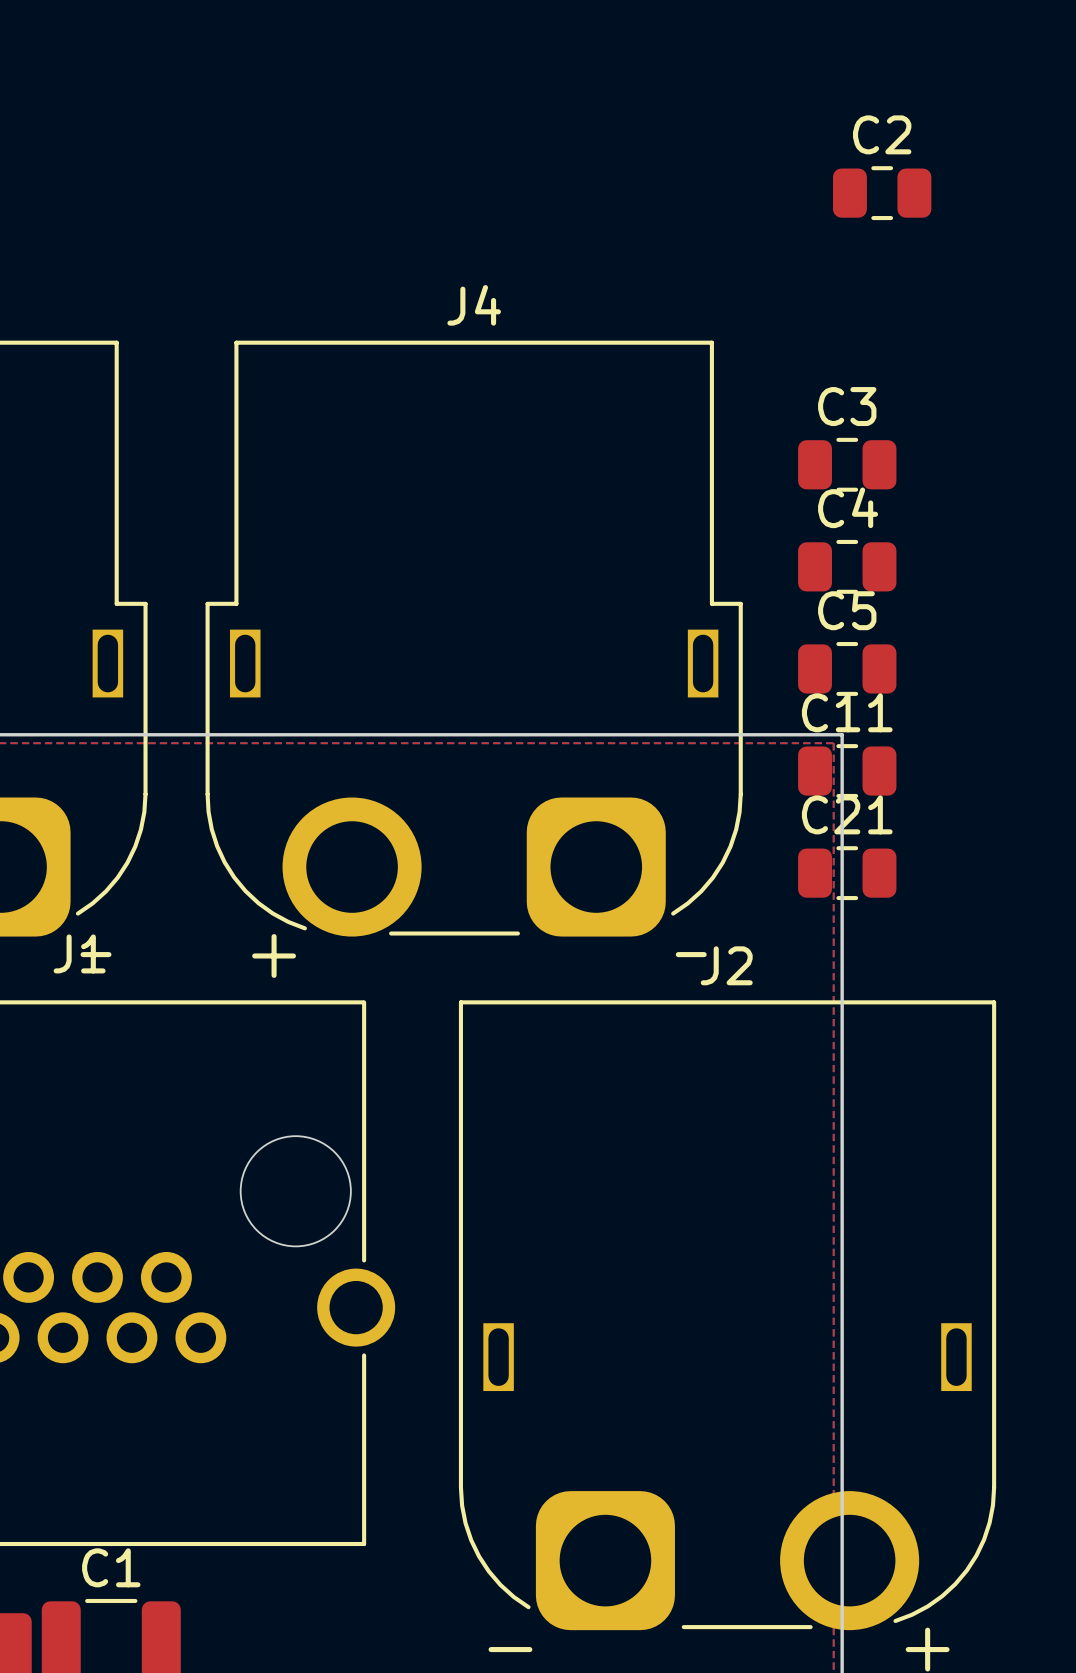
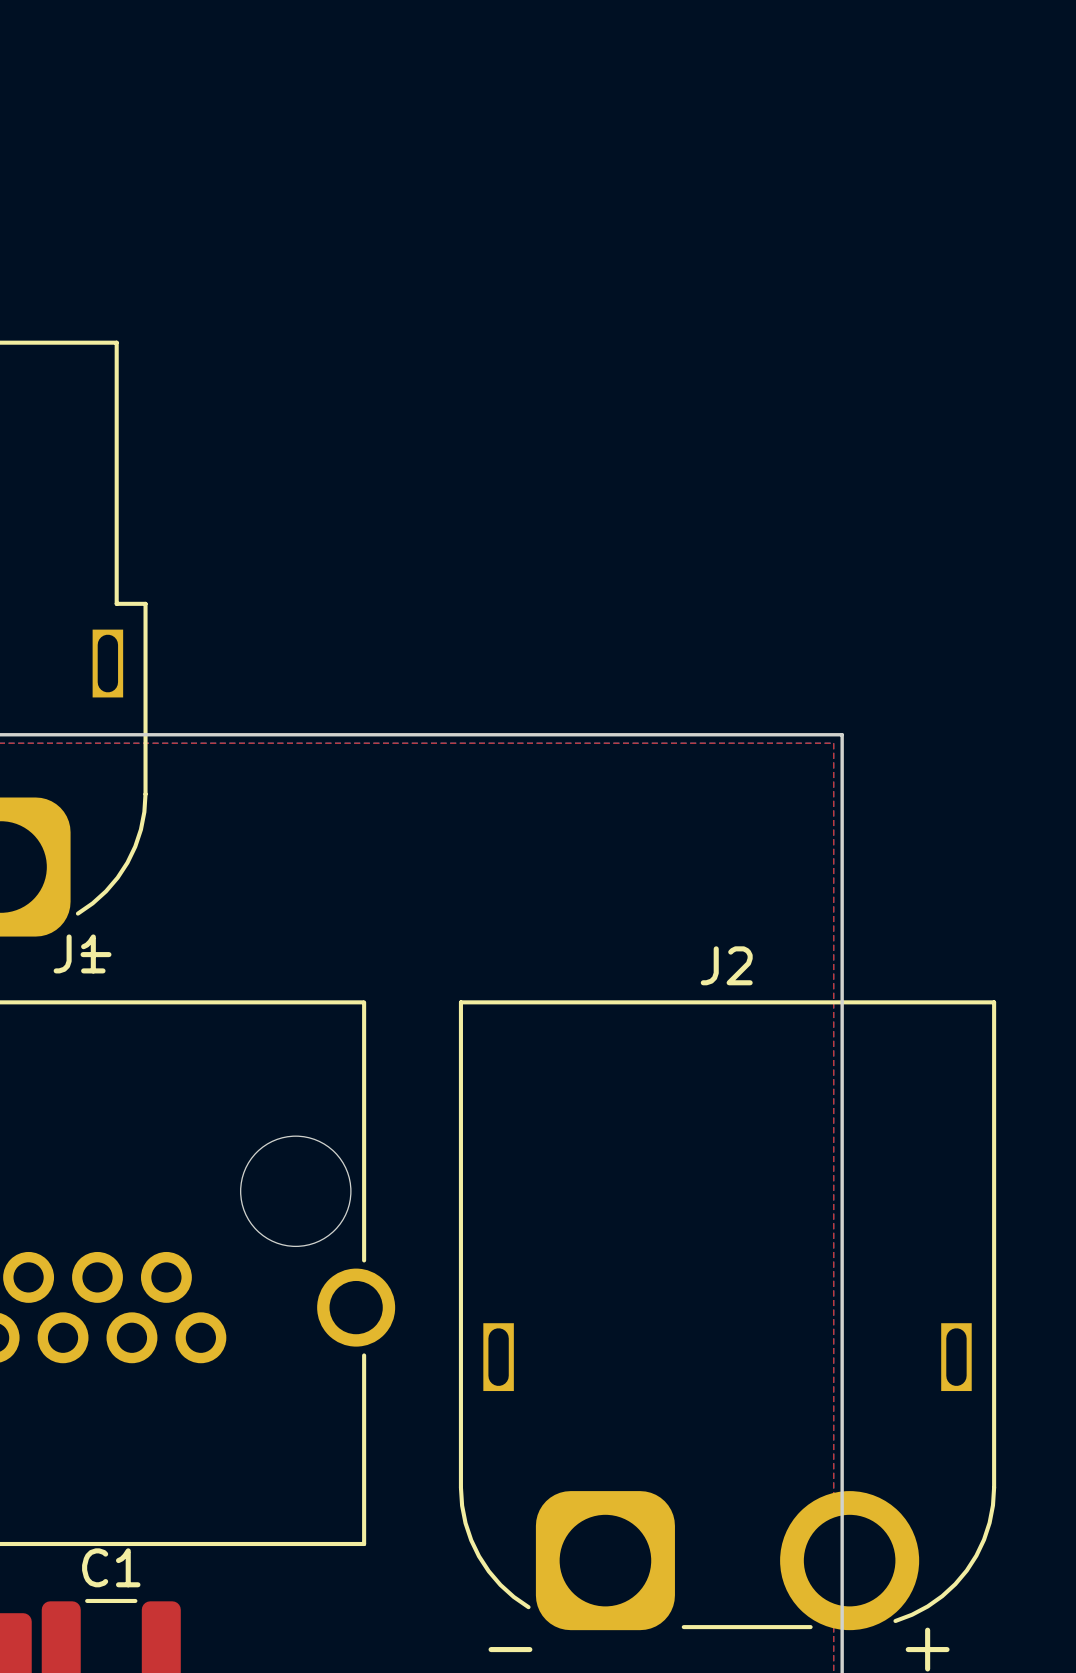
C2: (882, 193) -> none
C3: (847, 464) -> none
C4: (847, 566) -> none
J4: (474, 638) -> none
C5: (847, 668) -> none
C11: (847, 771) -> none
C21: (847, 873) -> none

